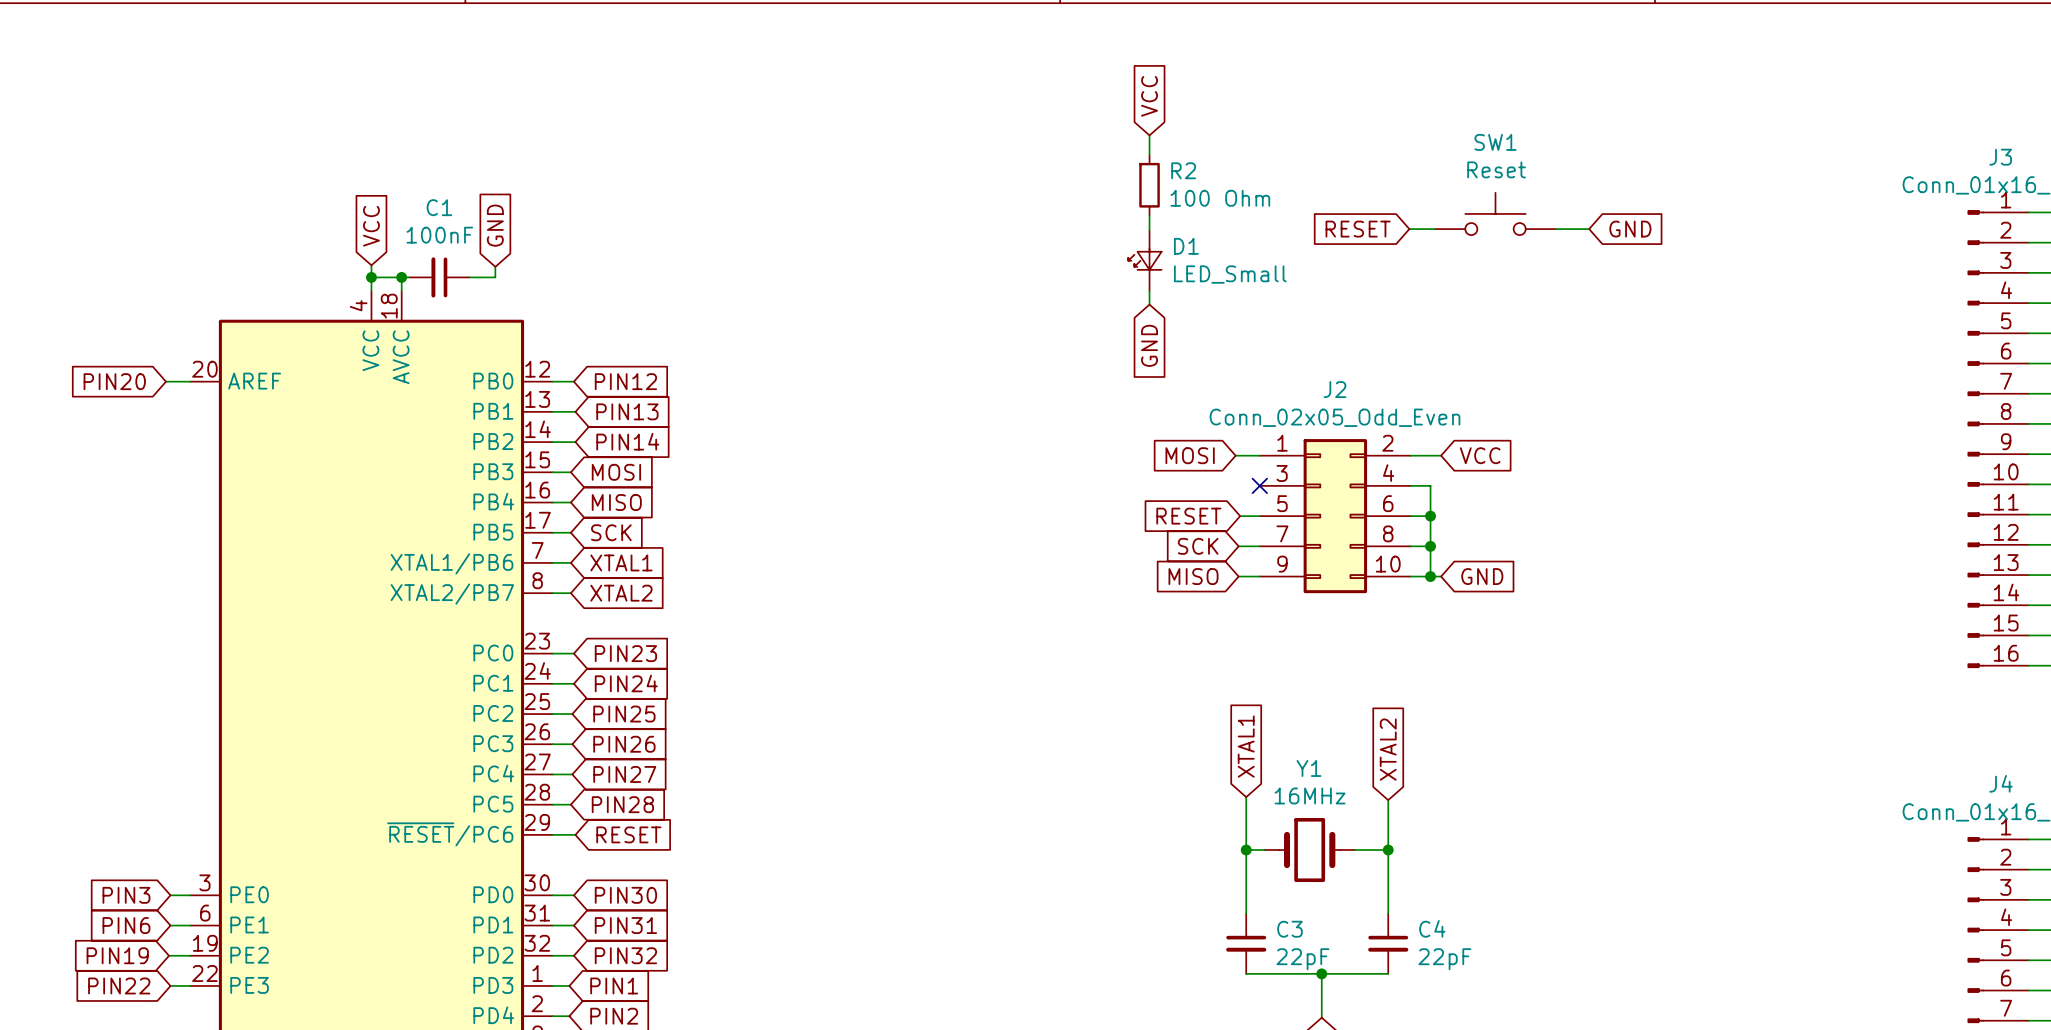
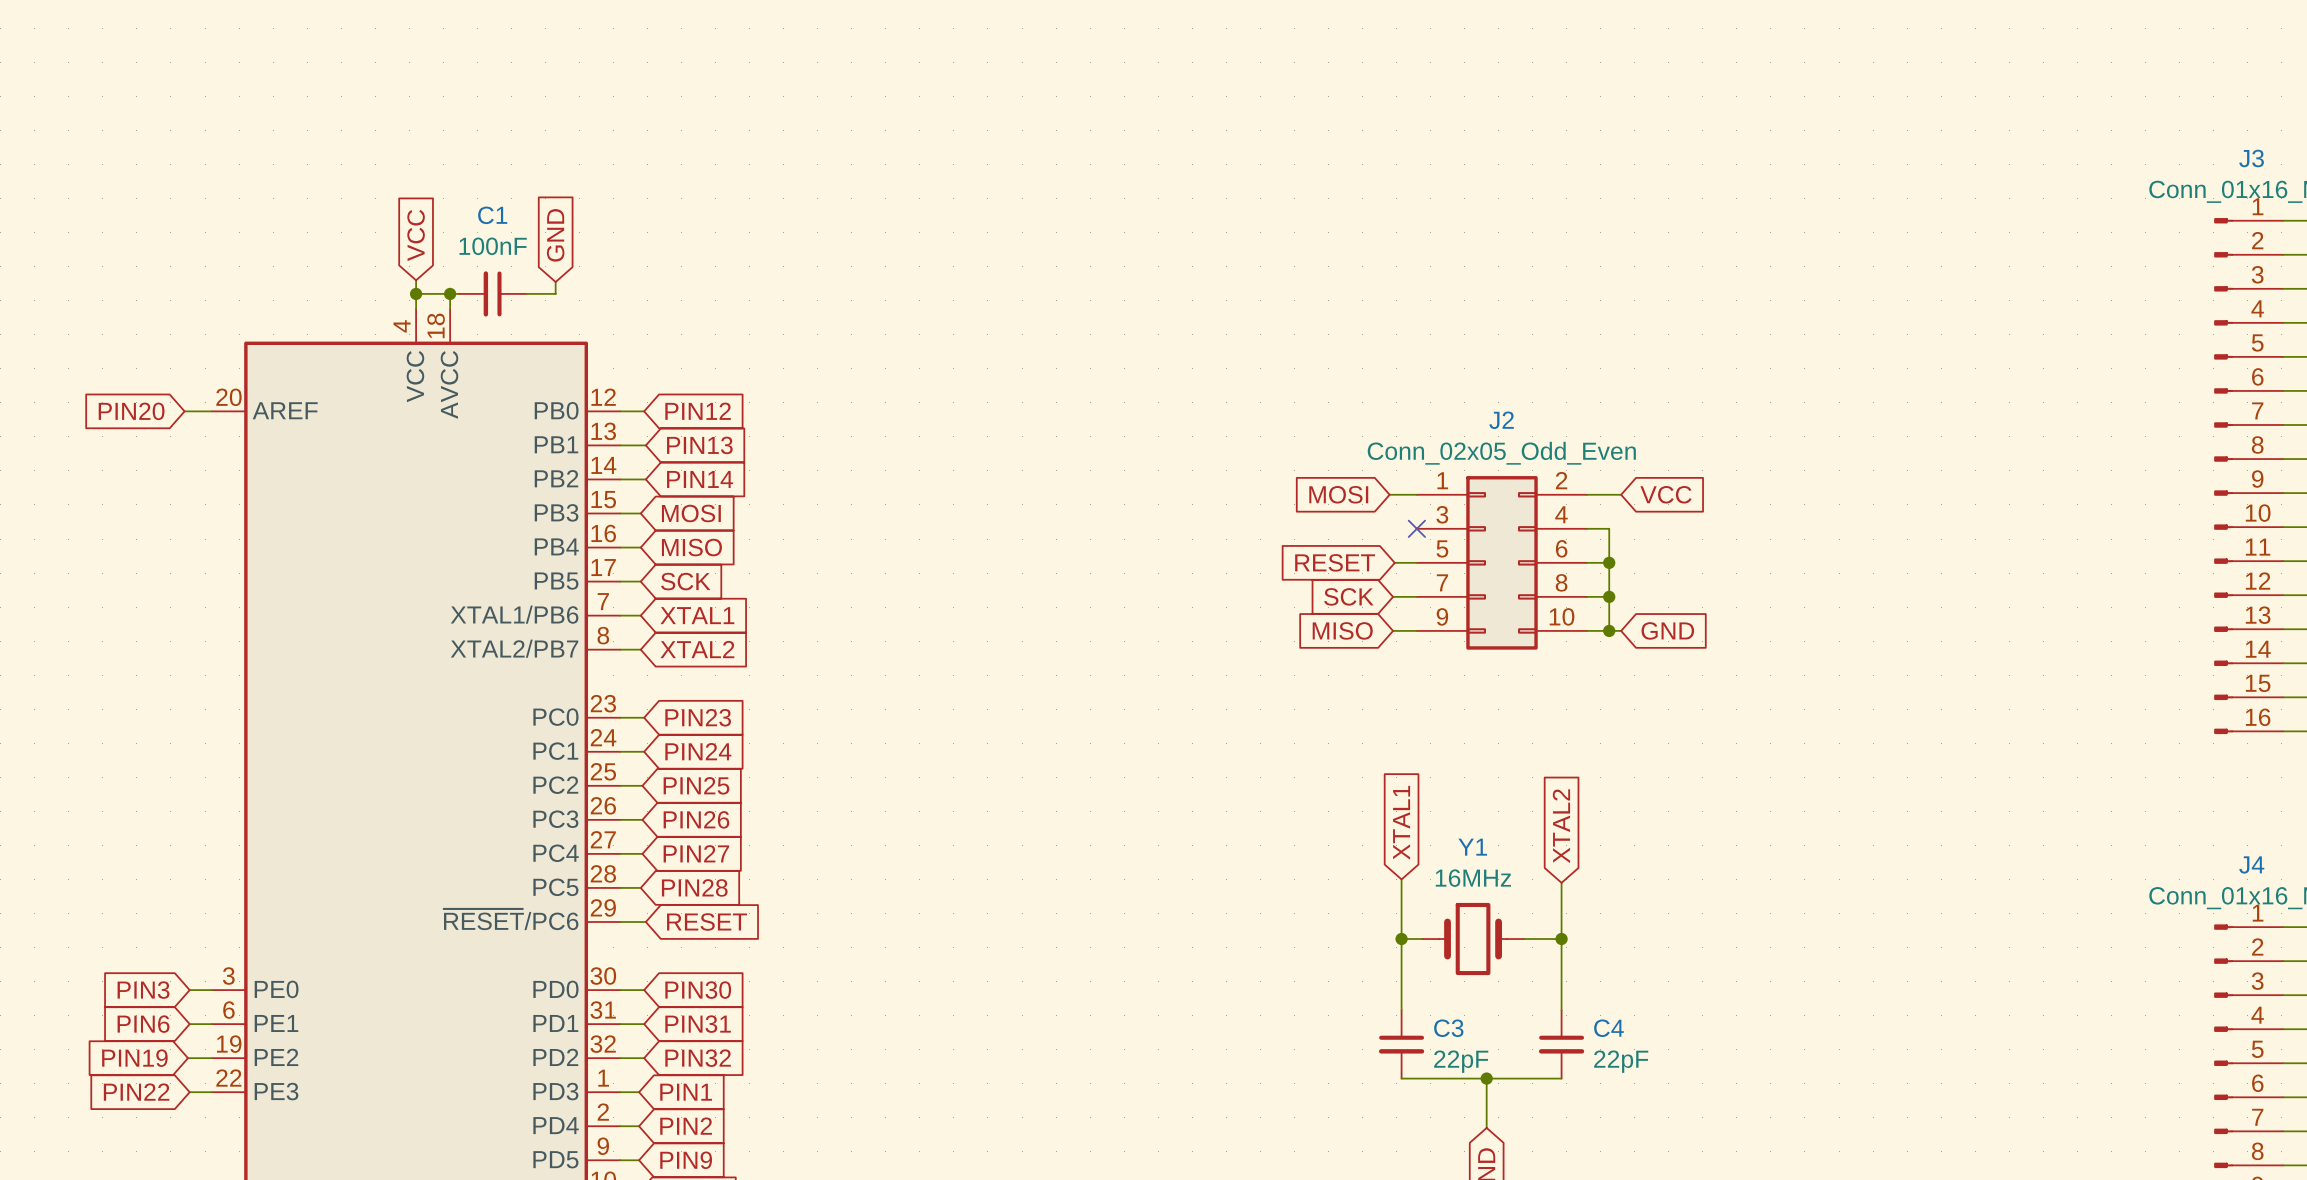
global label: VCC (1149, 96) -> none
wire: (1149, 135) (1149, 155) -> none
R2: 100 Ohm (1149, 185) -> none
SW1: Reset (1495, 213) -> none
wire: (1149, 215) (1149, 230) -> none
global label: RESET (1358, 229) -> none
wire: (1409, 229) (1435, 229) -> none
wire: (1555, 229) (1589, 229) -> none
global label: GND (1630, 229) -> none
D1: LED_Small (1144, 260) -> none
wire: (1149, 291) (1149, 304) -> none
global label: GND (1149, 345) -> none

